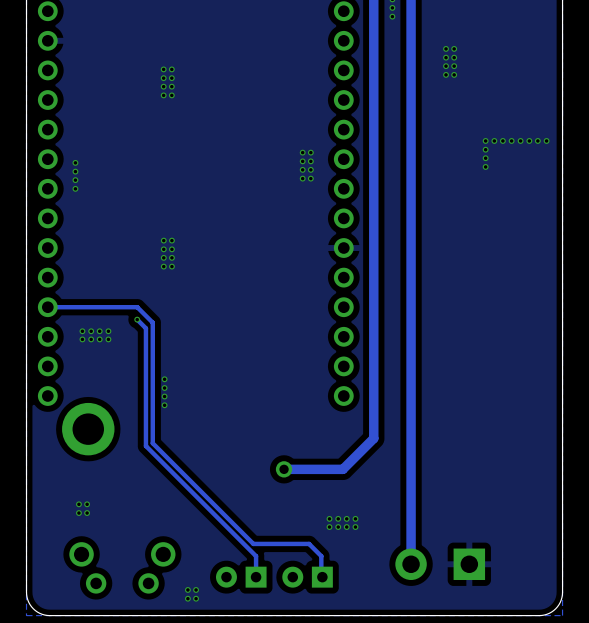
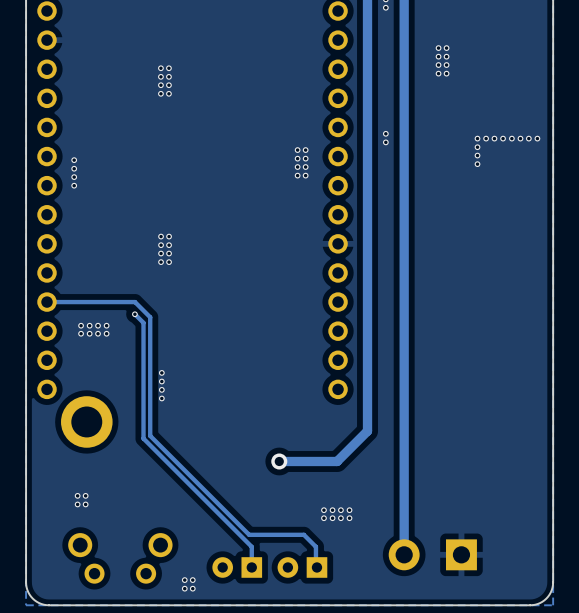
via: (392, 16) -> none
via: none -> (385, 133)
via: none -> (385, 142)

